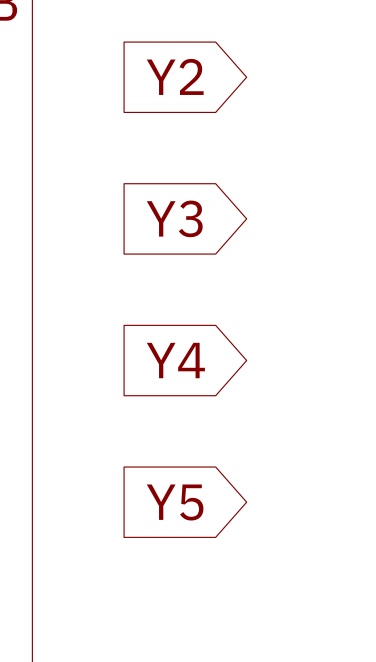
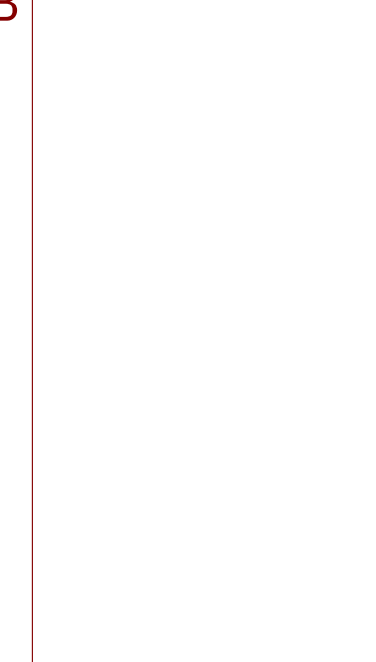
global label: Y2 (175, 76) -> none
global label: Y3 (174, 218) -> none
global label: Y4 (175, 360) -> none
global label: Y5 (175, 502) -> none

